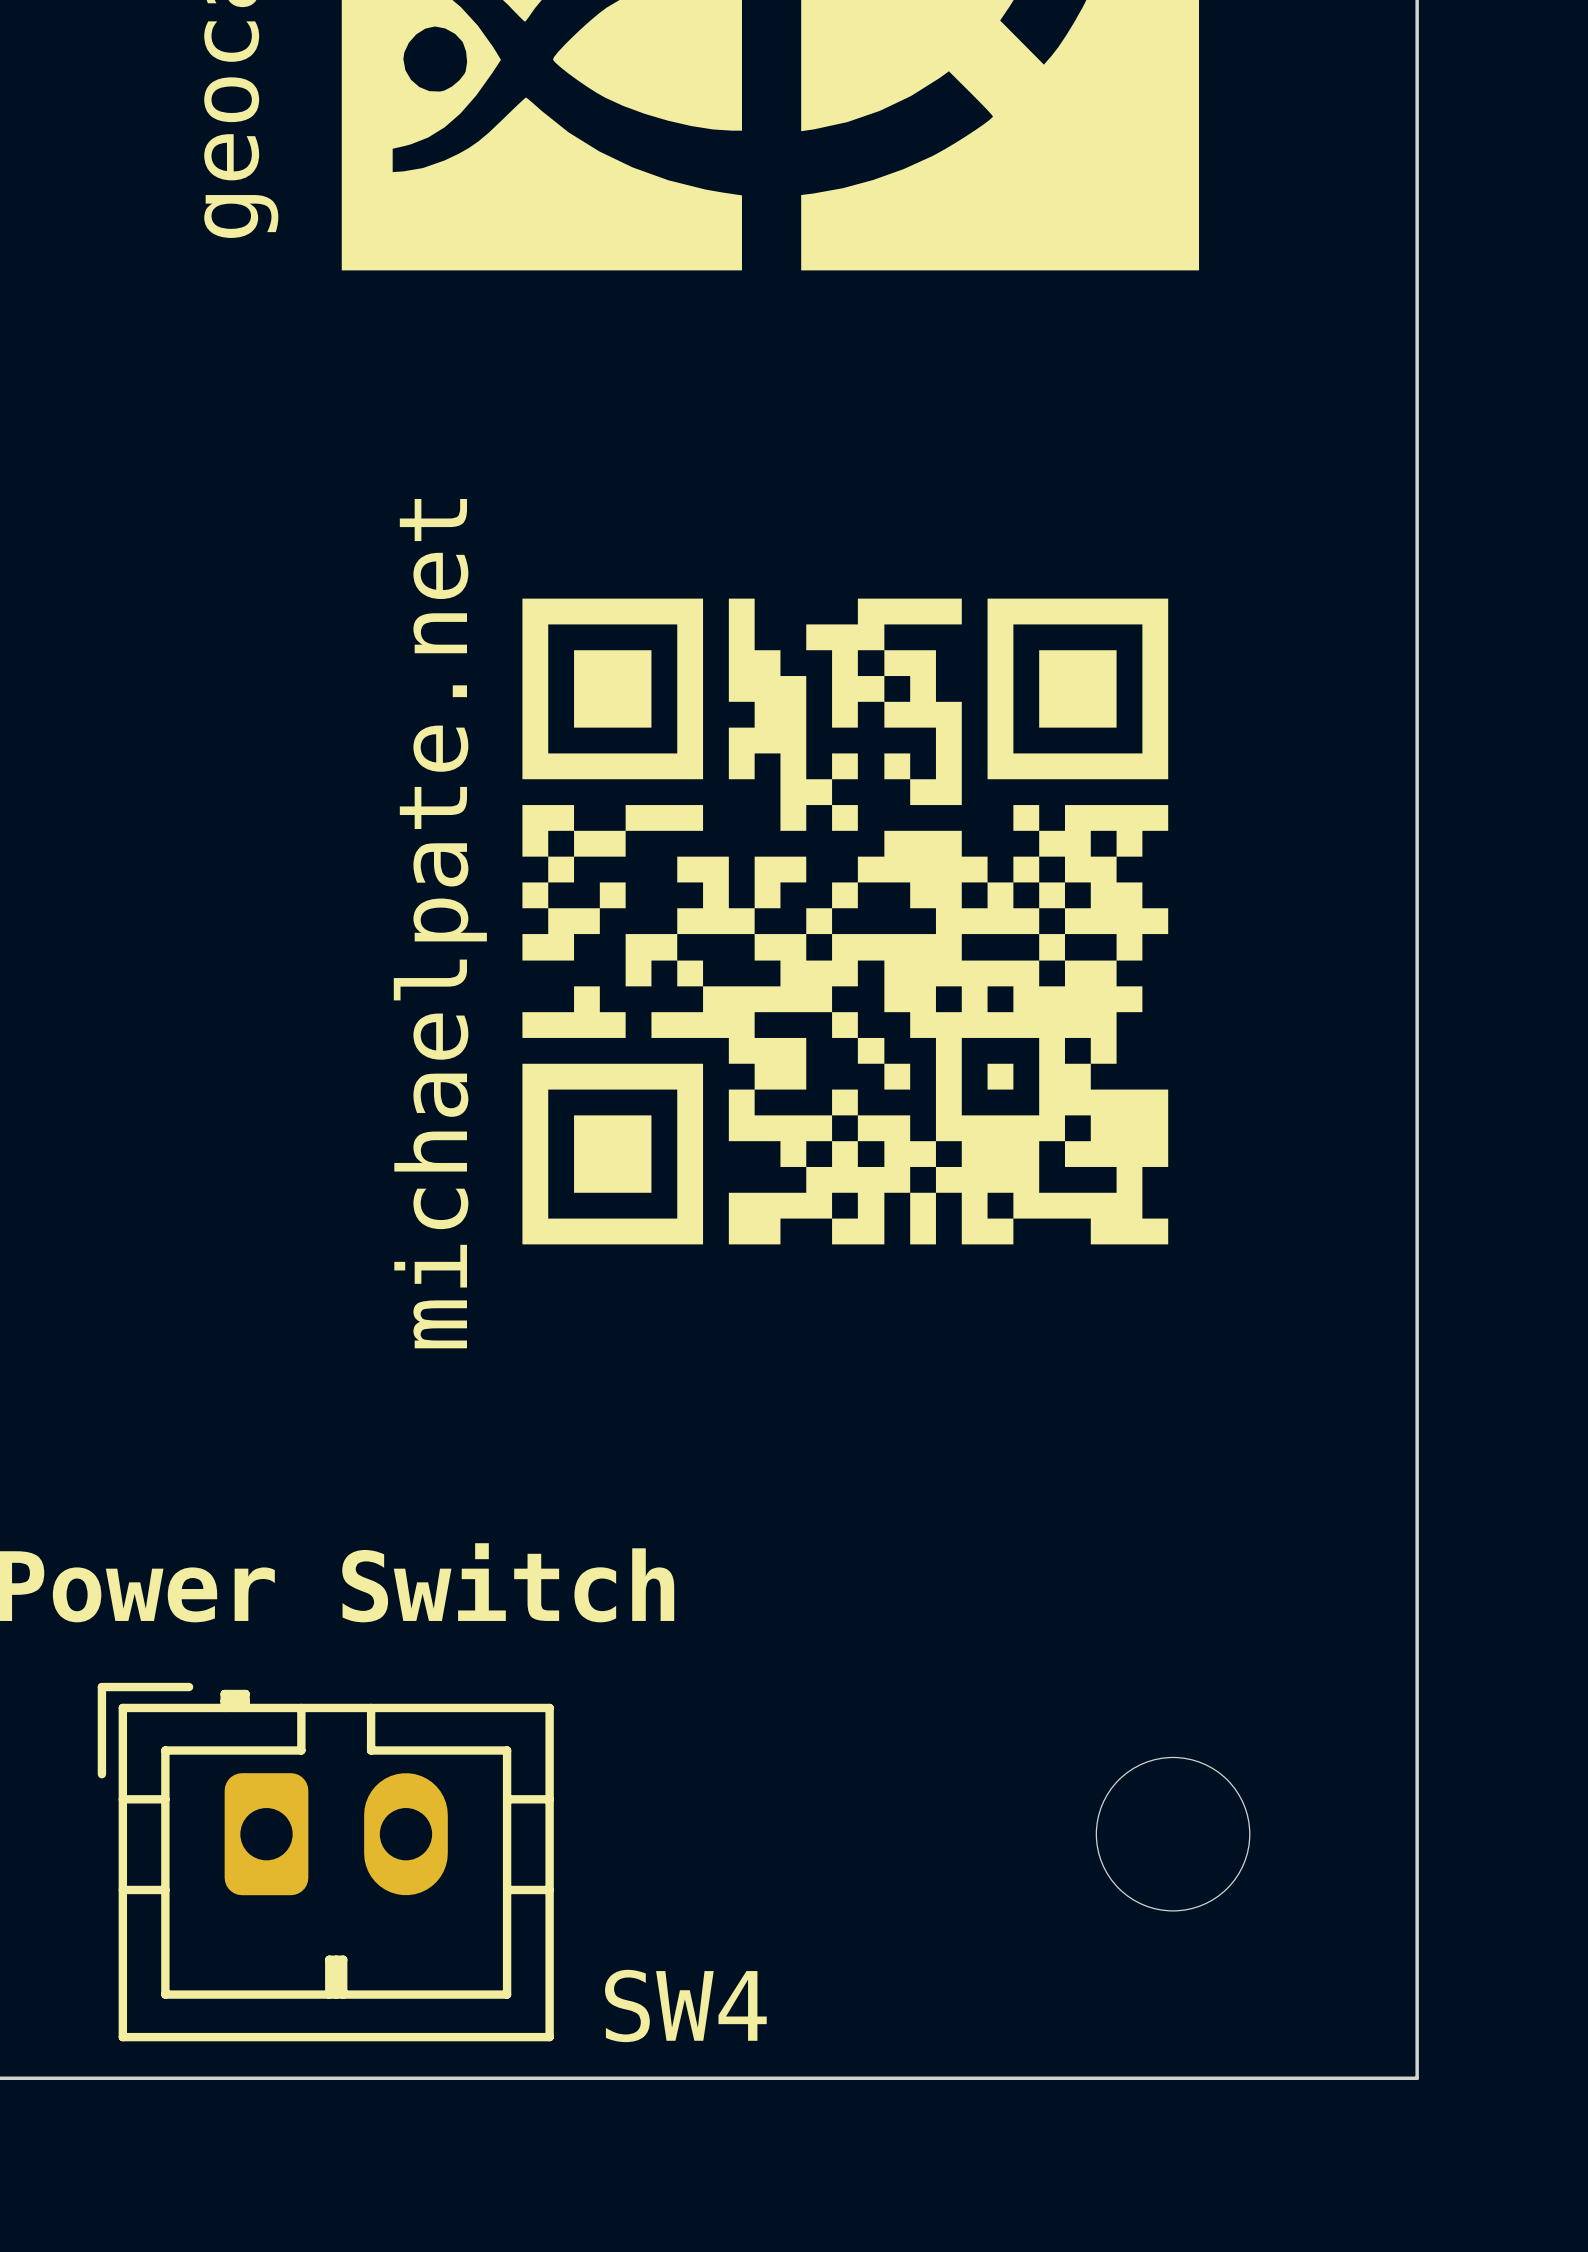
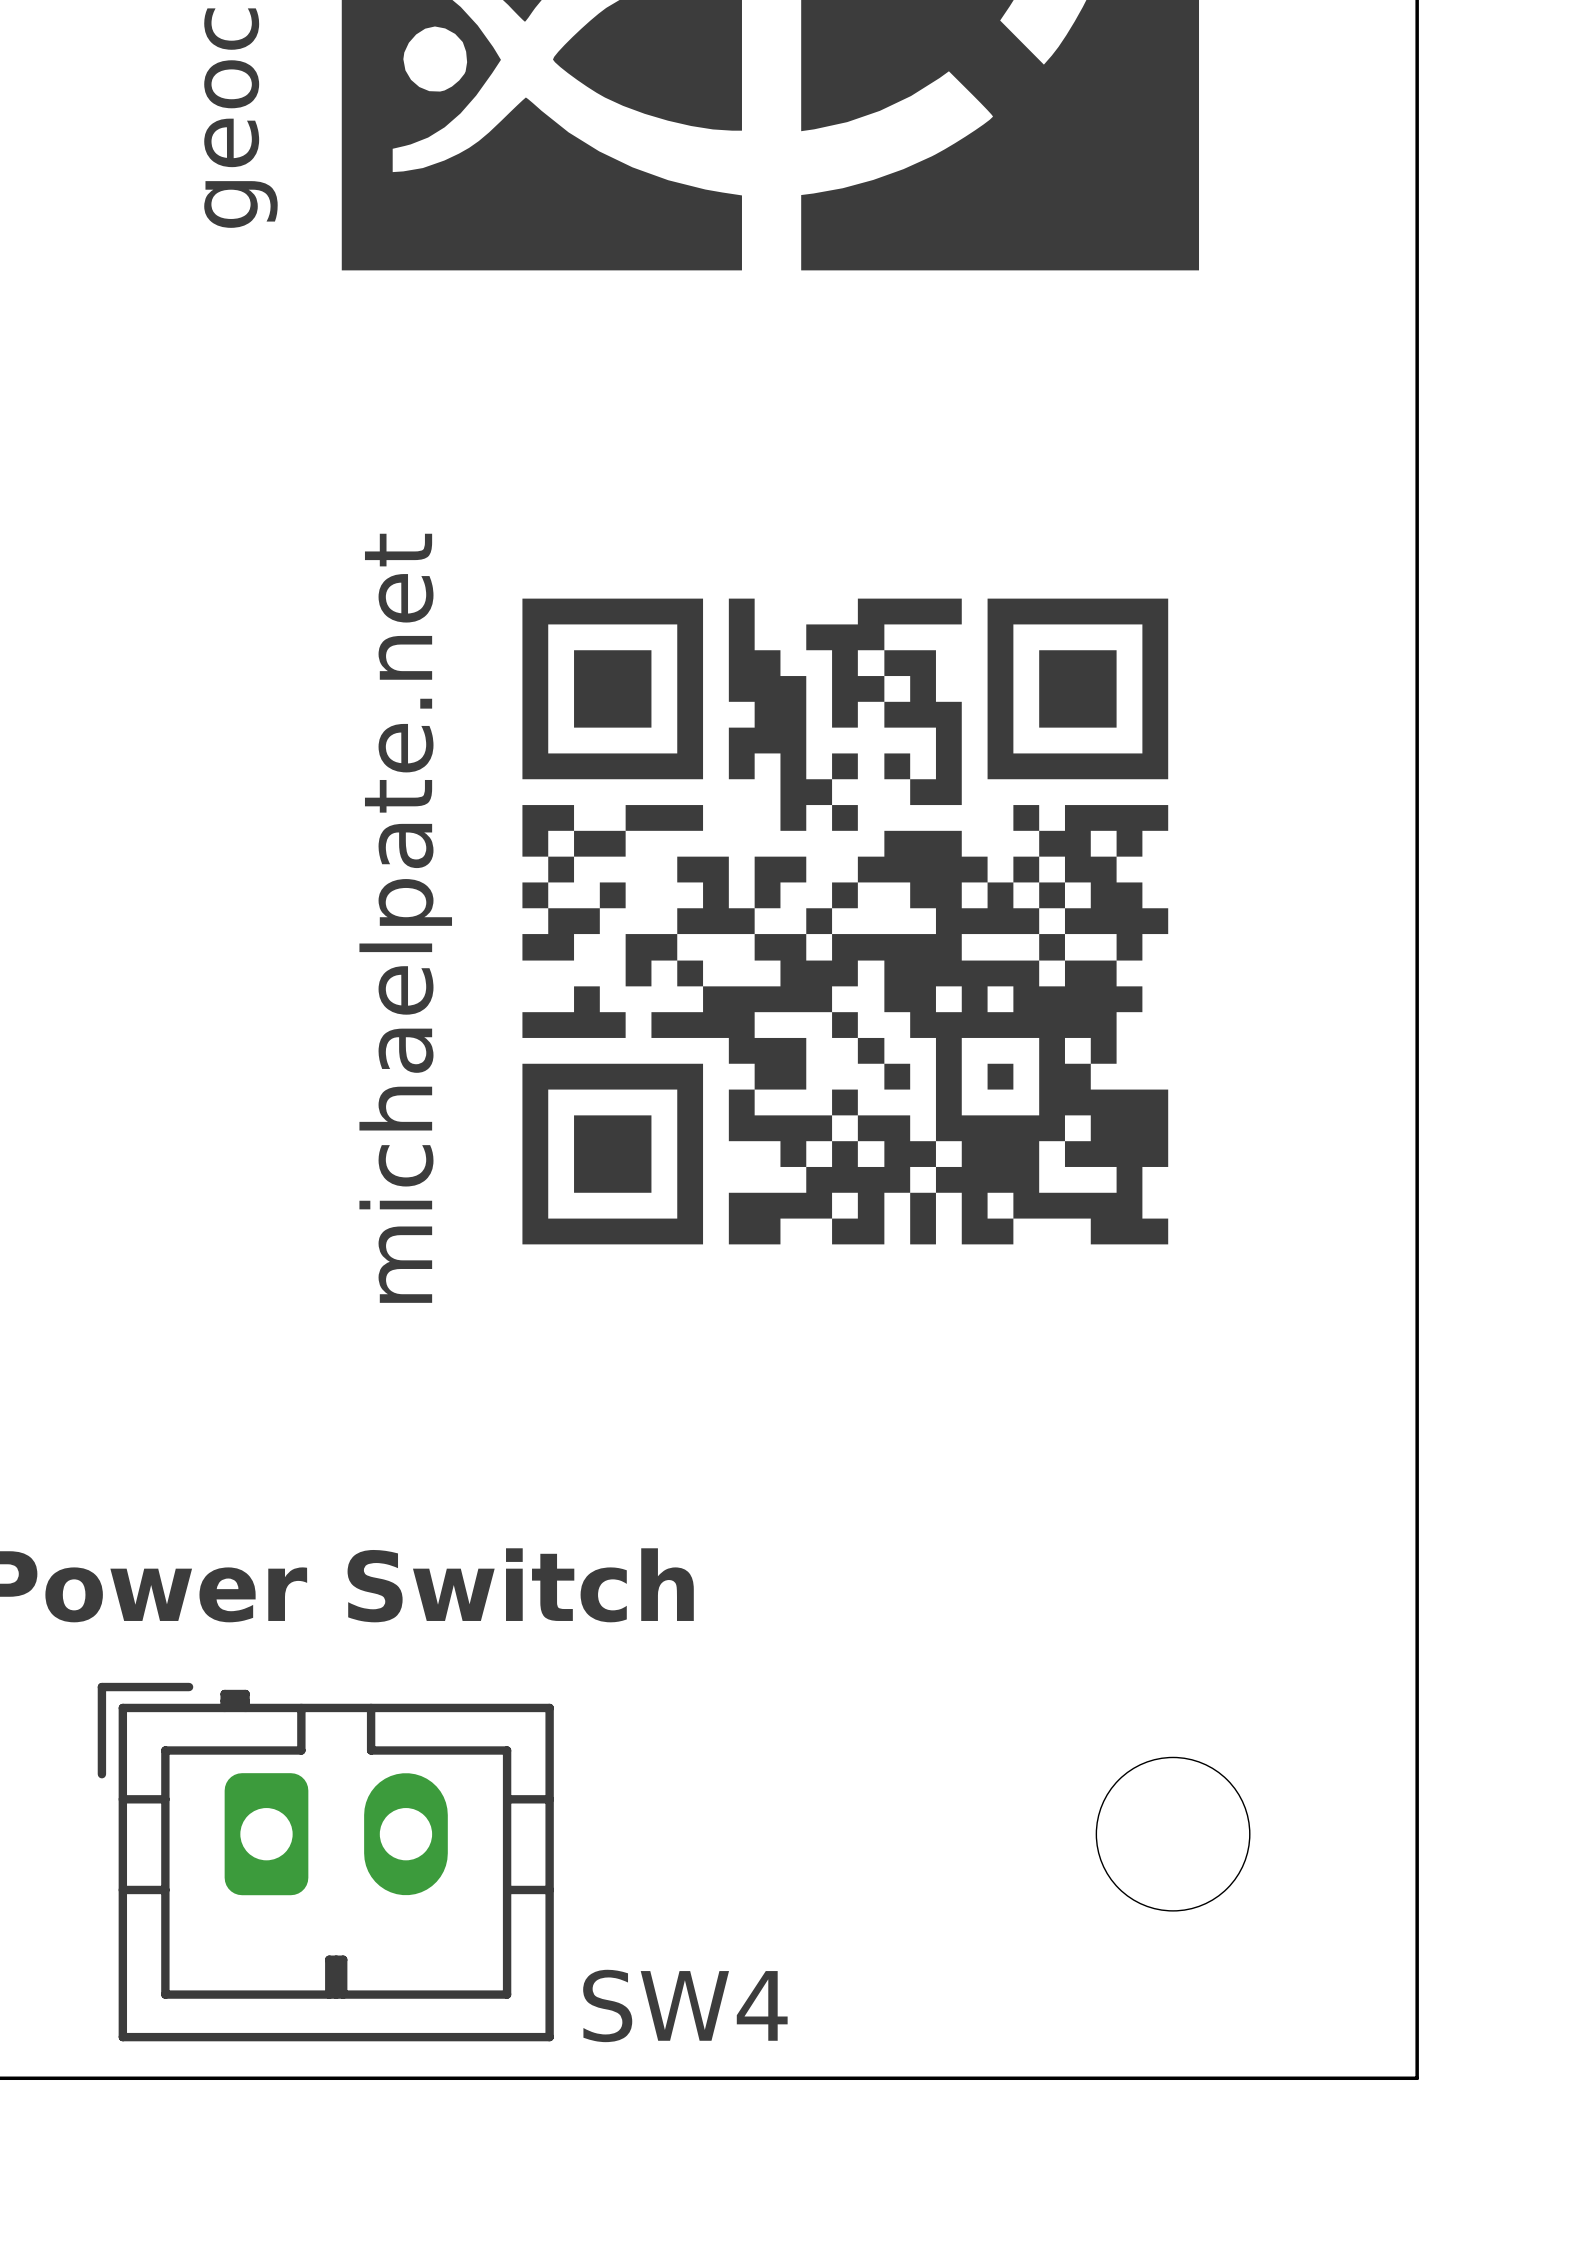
text position: michaelpate.net (440, 923) -> michaelpate.net (405, 918)

